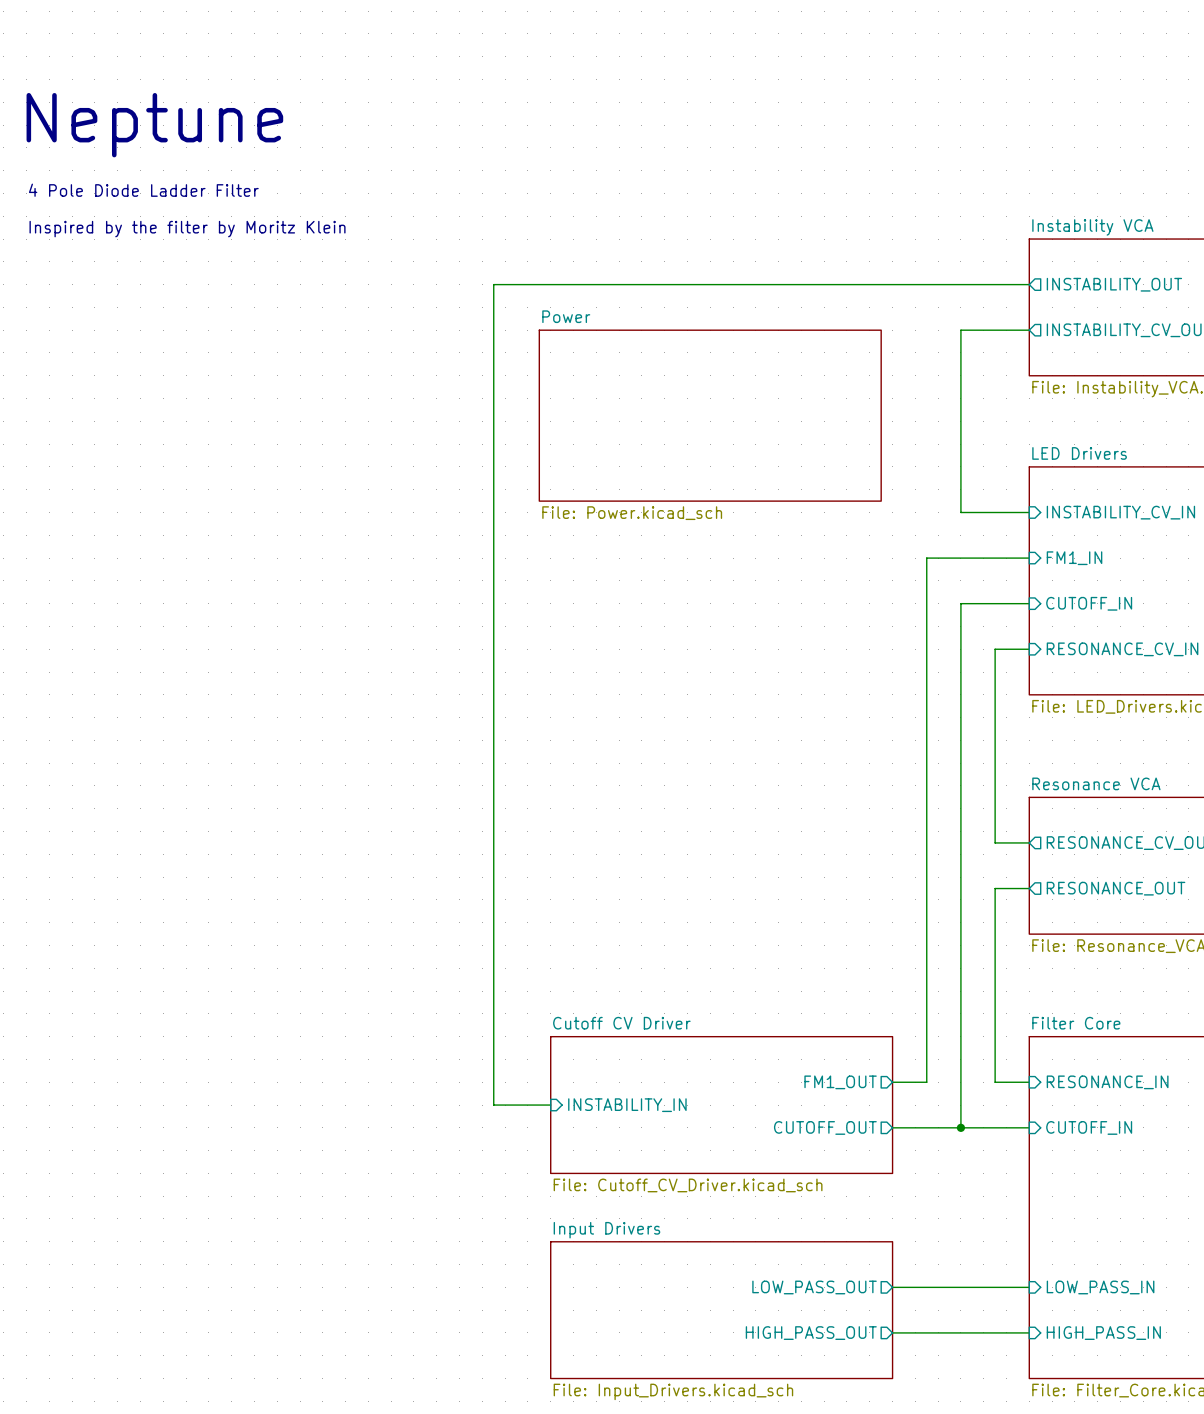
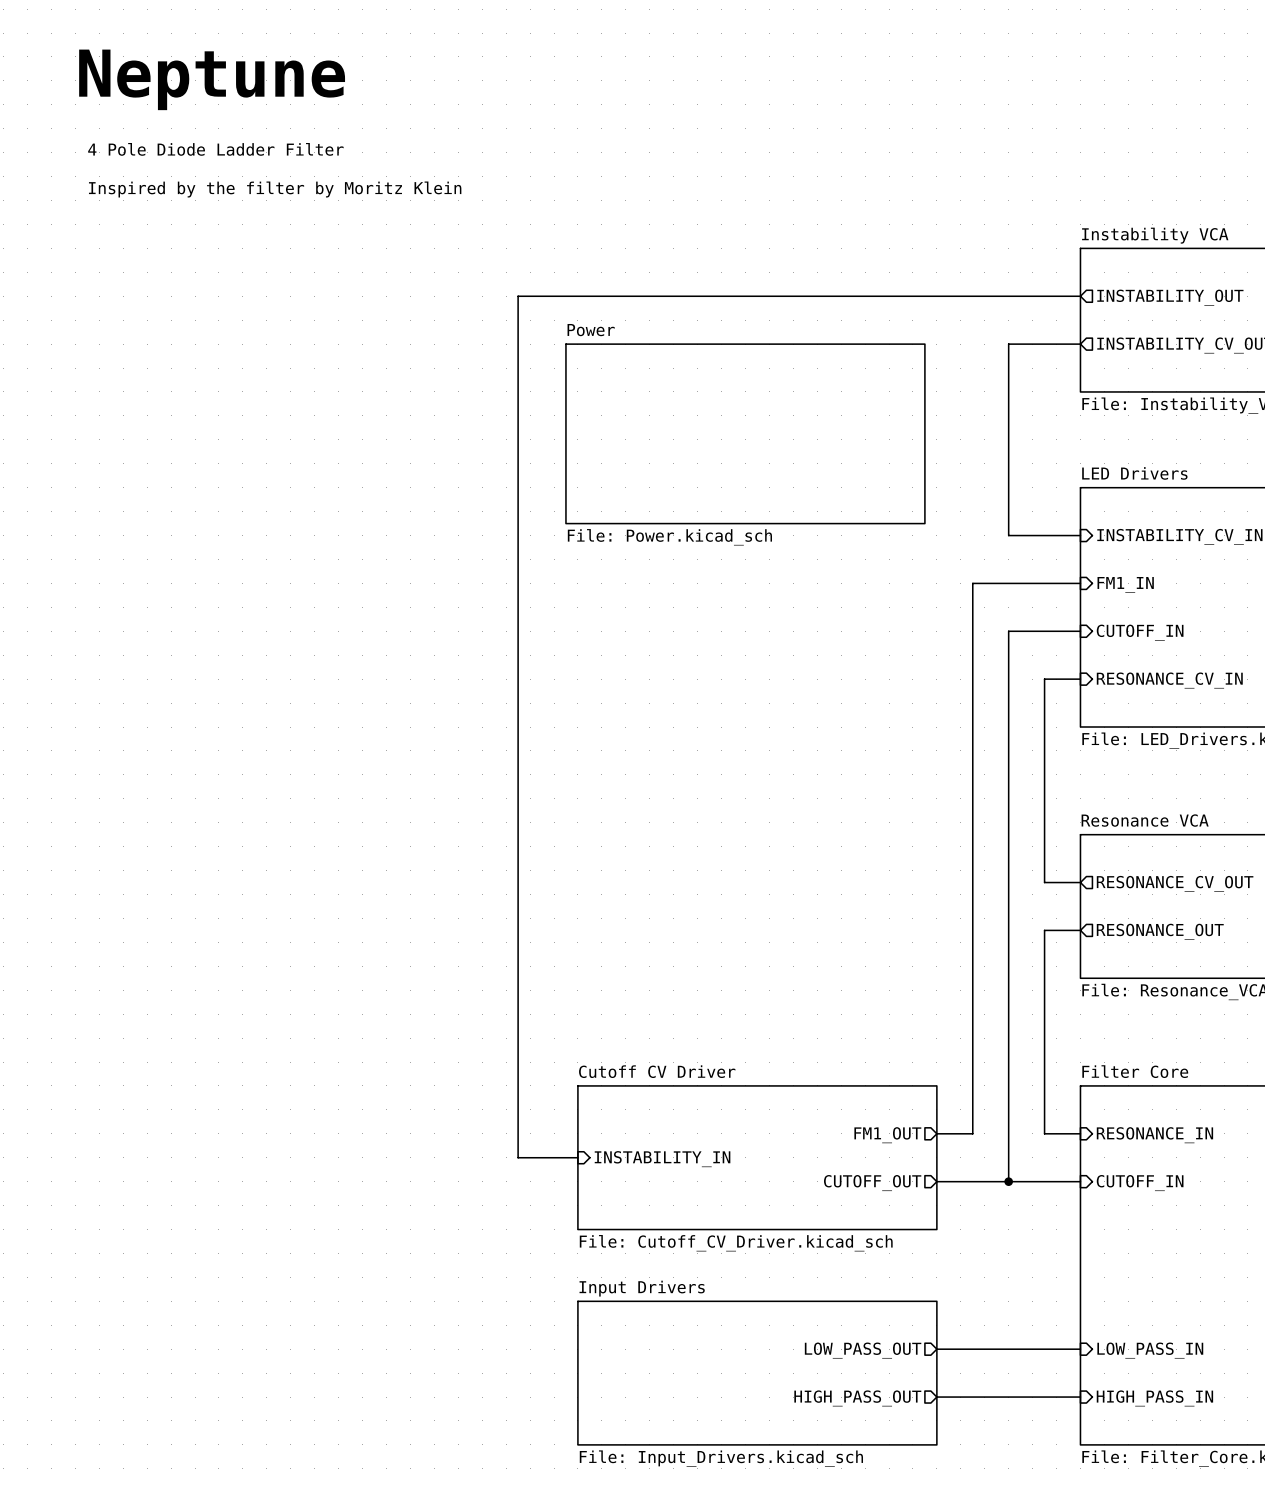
text position: Neptune (154, 125) -> Neptune (212, 79)
text position: 4 Pole Diode Ladder Filter (143, 190) -> 4 Pole Diode Ladder Filter (215, 149)
text position: Inspired by the filter by Moritz Klein (187, 229) -> Inspired by the filter by Moritz Klein (275, 189)

